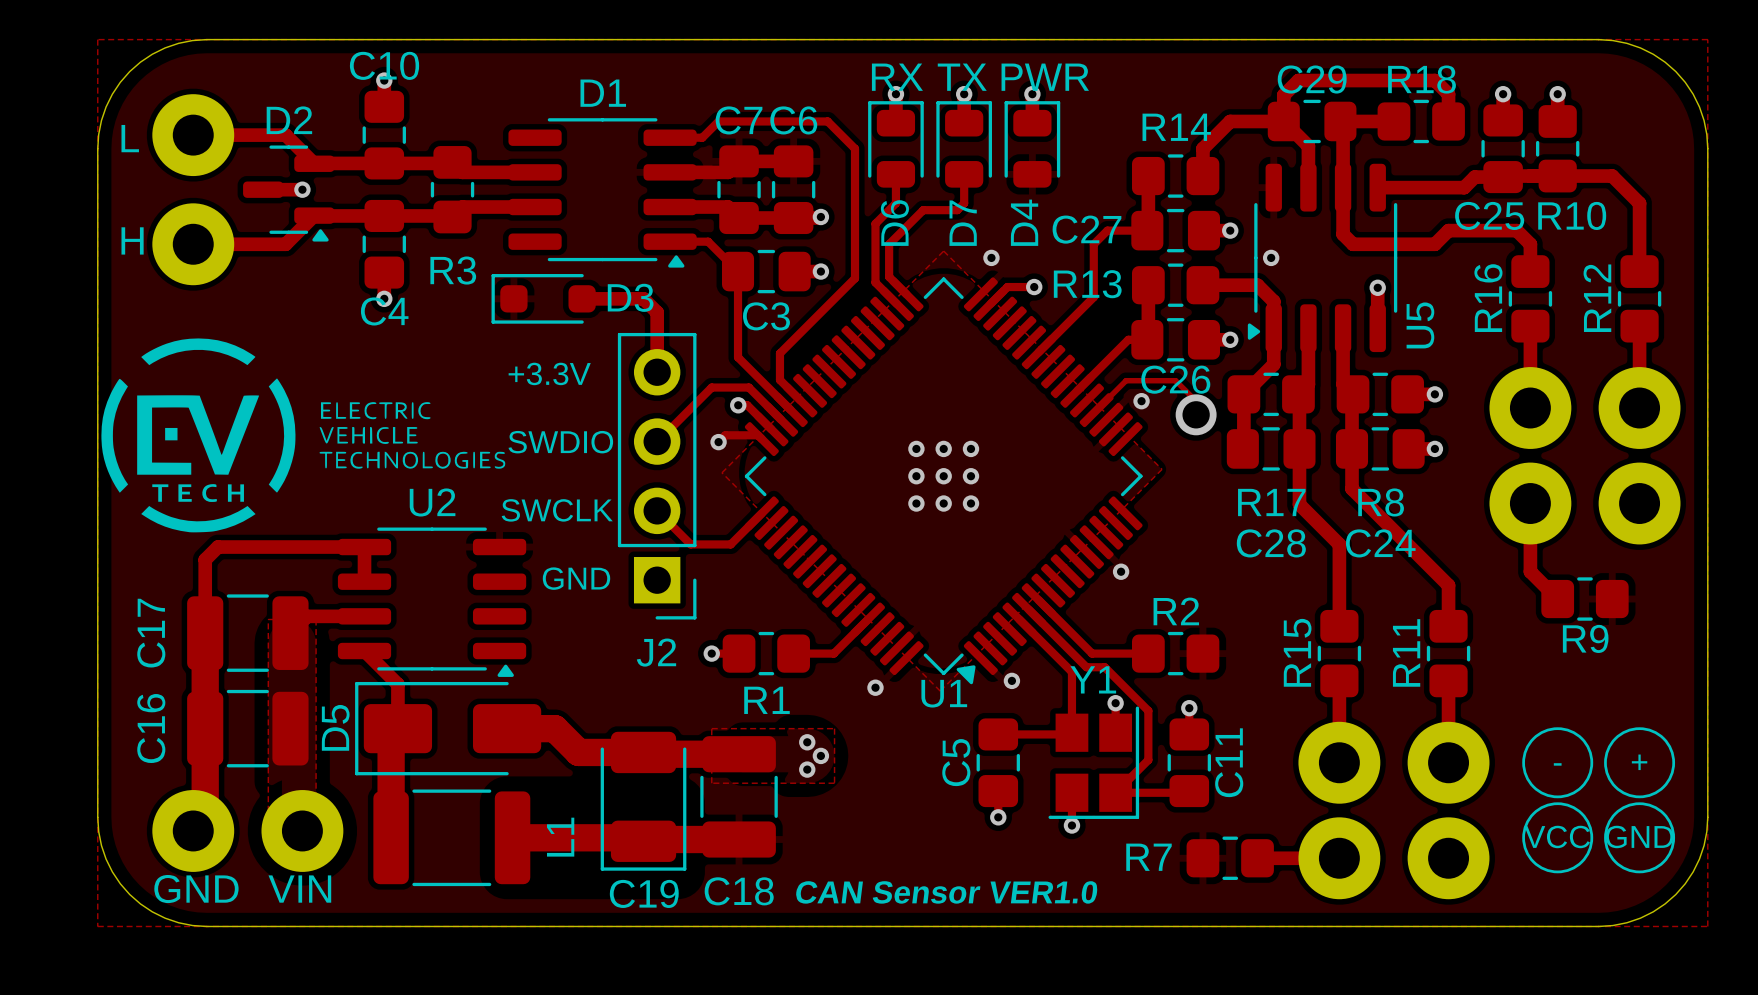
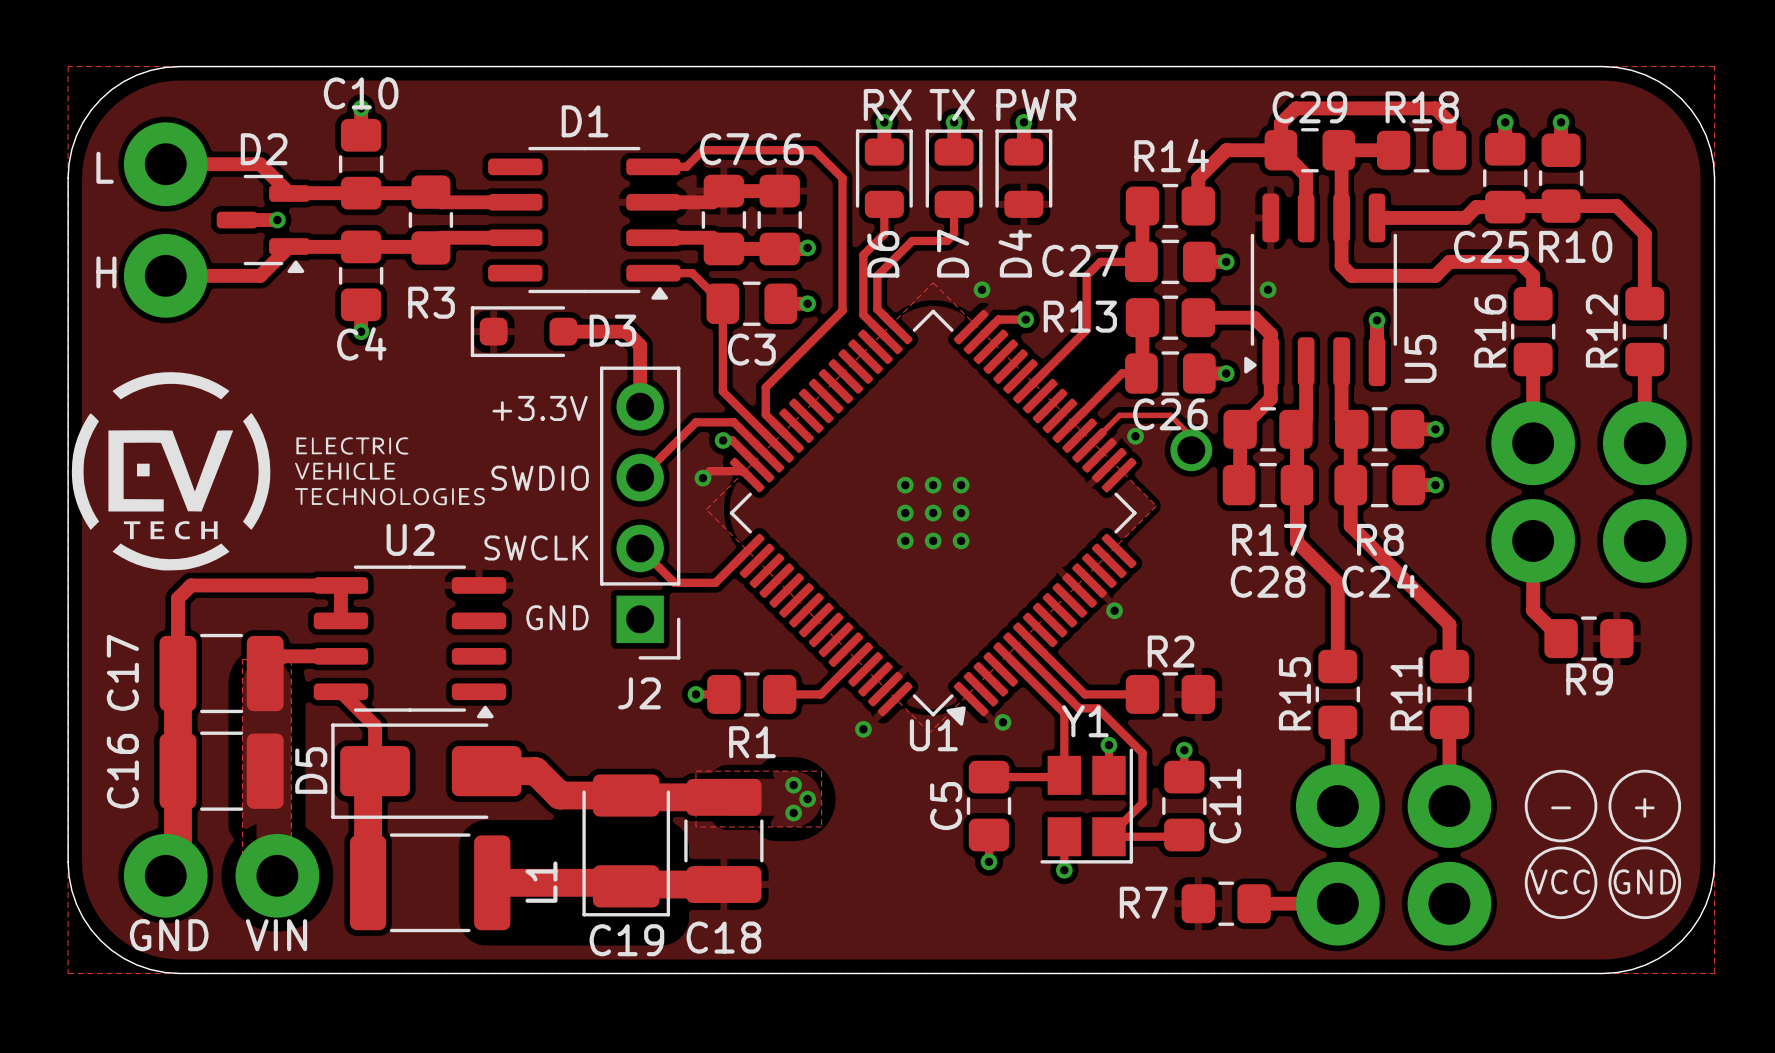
text: CAN Sensor VER1.0 (946, 892) -> none

